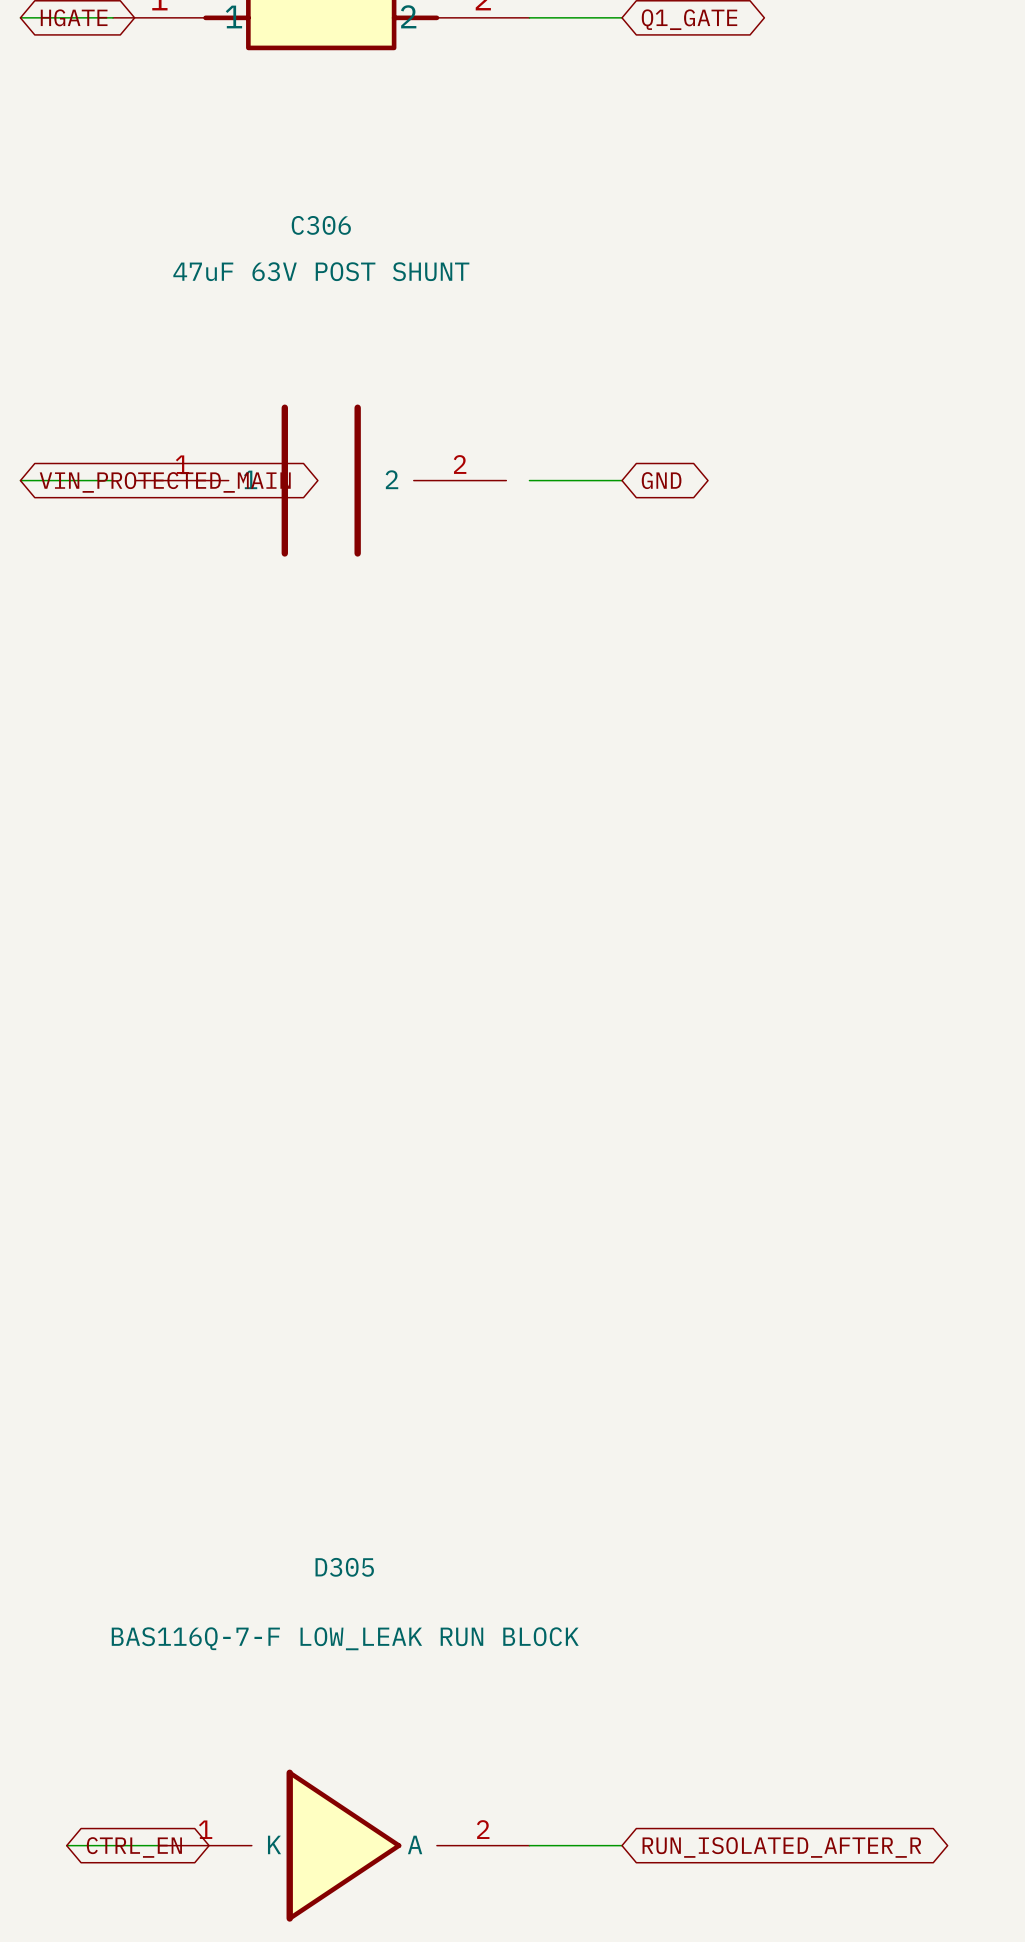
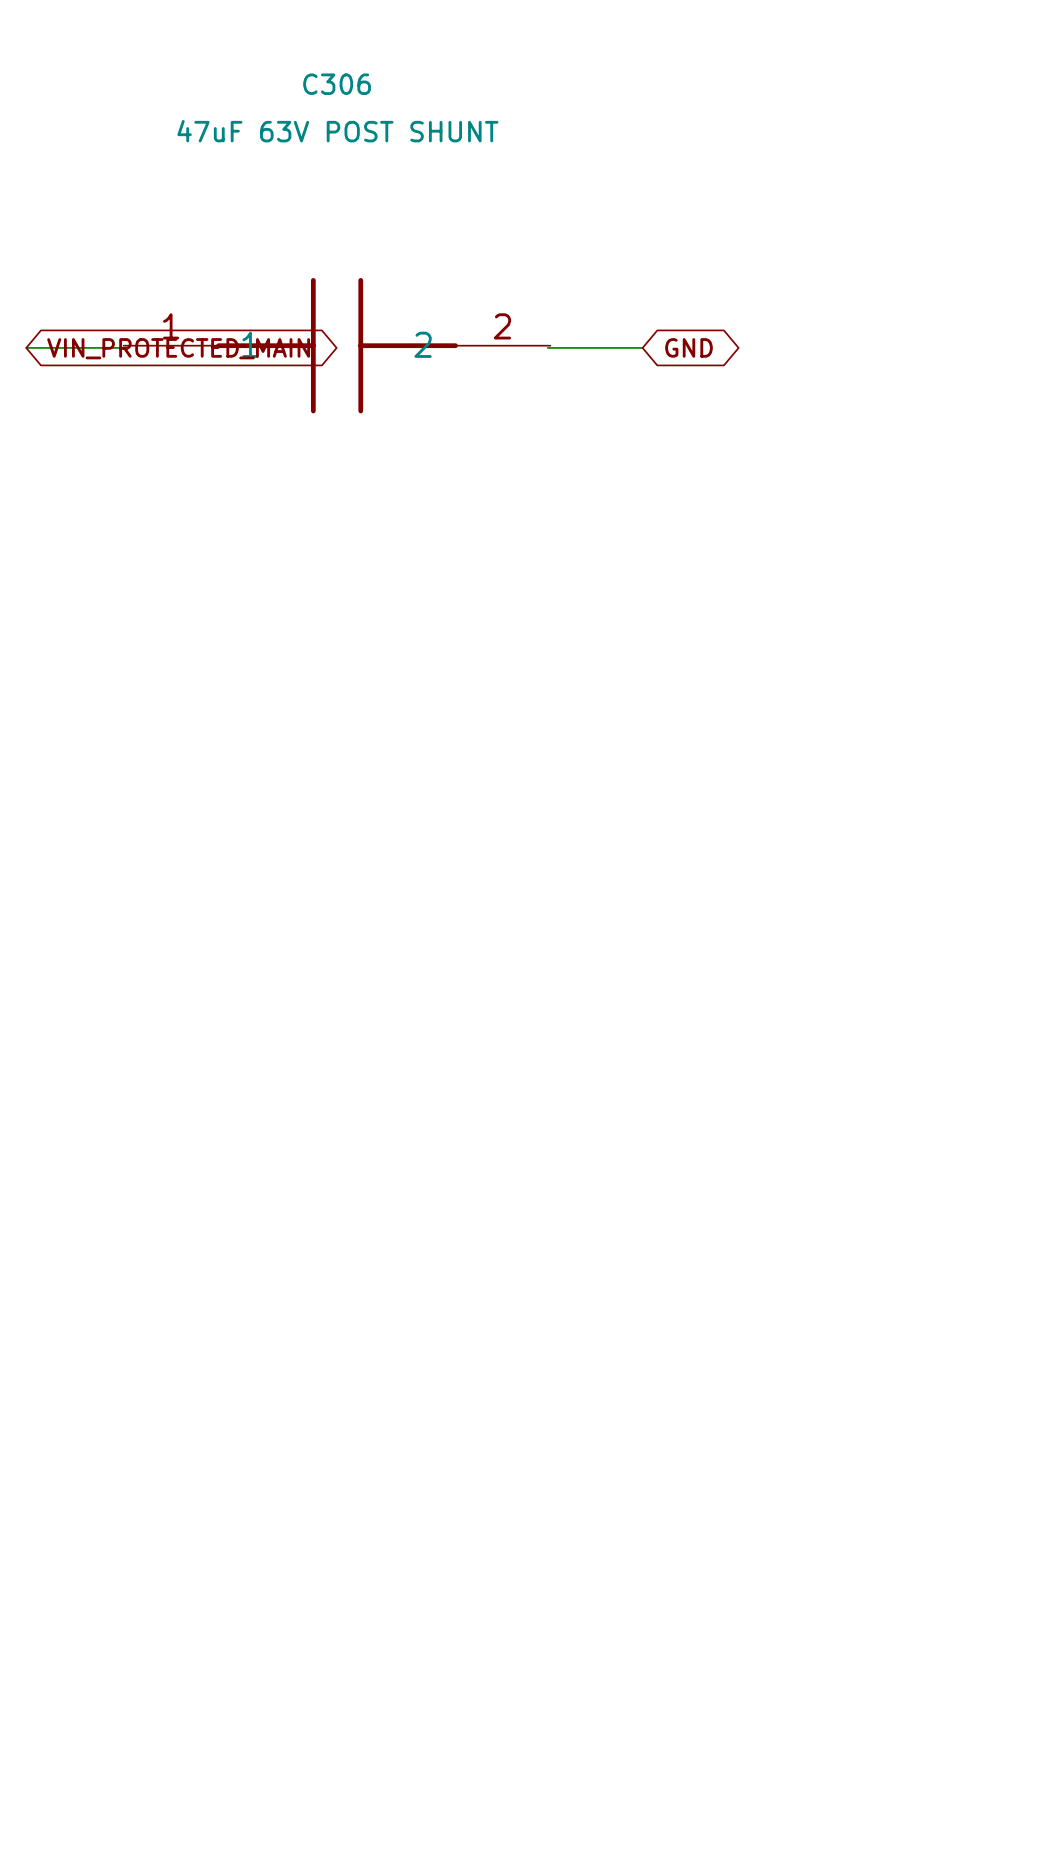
C306 symbol: [136, 404, 507, 557] -> [123, 277, 551, 414]
wire: (66, 1845) (159, 1845) -> none
D305: BAS116Q-7-F LOW_LEAK RUN BLOCK (344, 1845) -> none
wire: (529, 1845) (622, 1845) -> none
global label: CTRL_EN (134, 1847) -> none
global label: RUN_ISOLATED_AFTER_R (781, 1847) -> none

